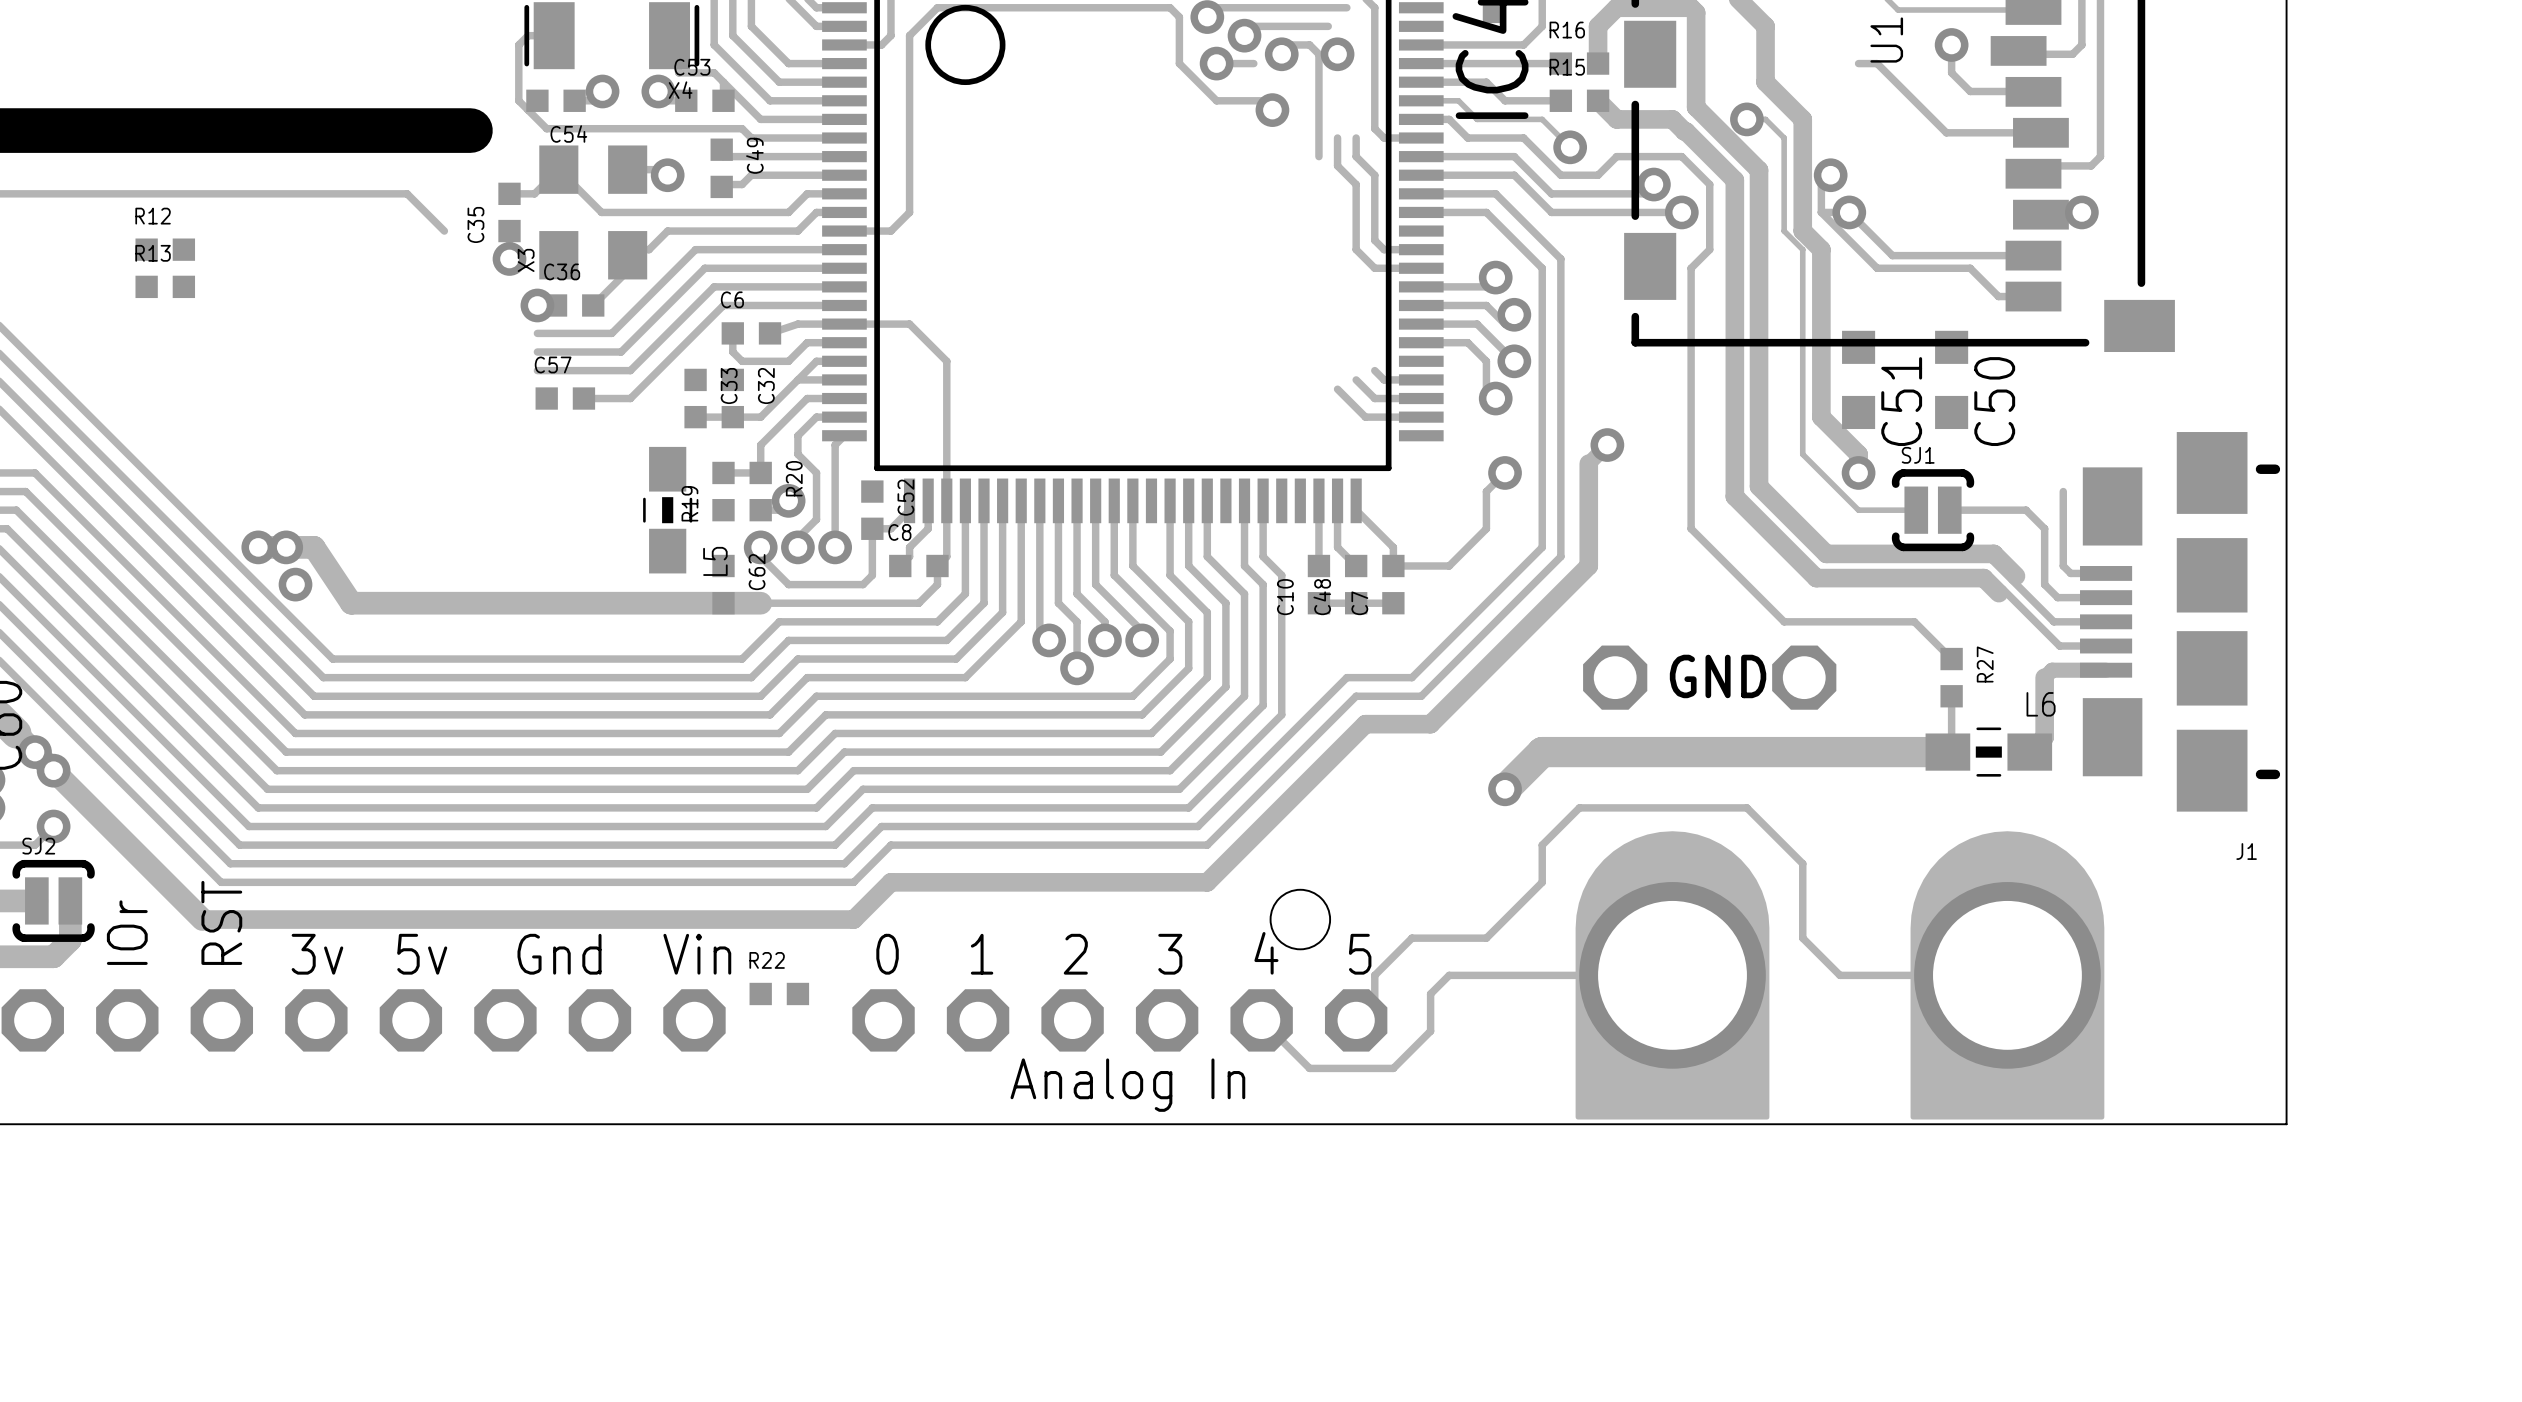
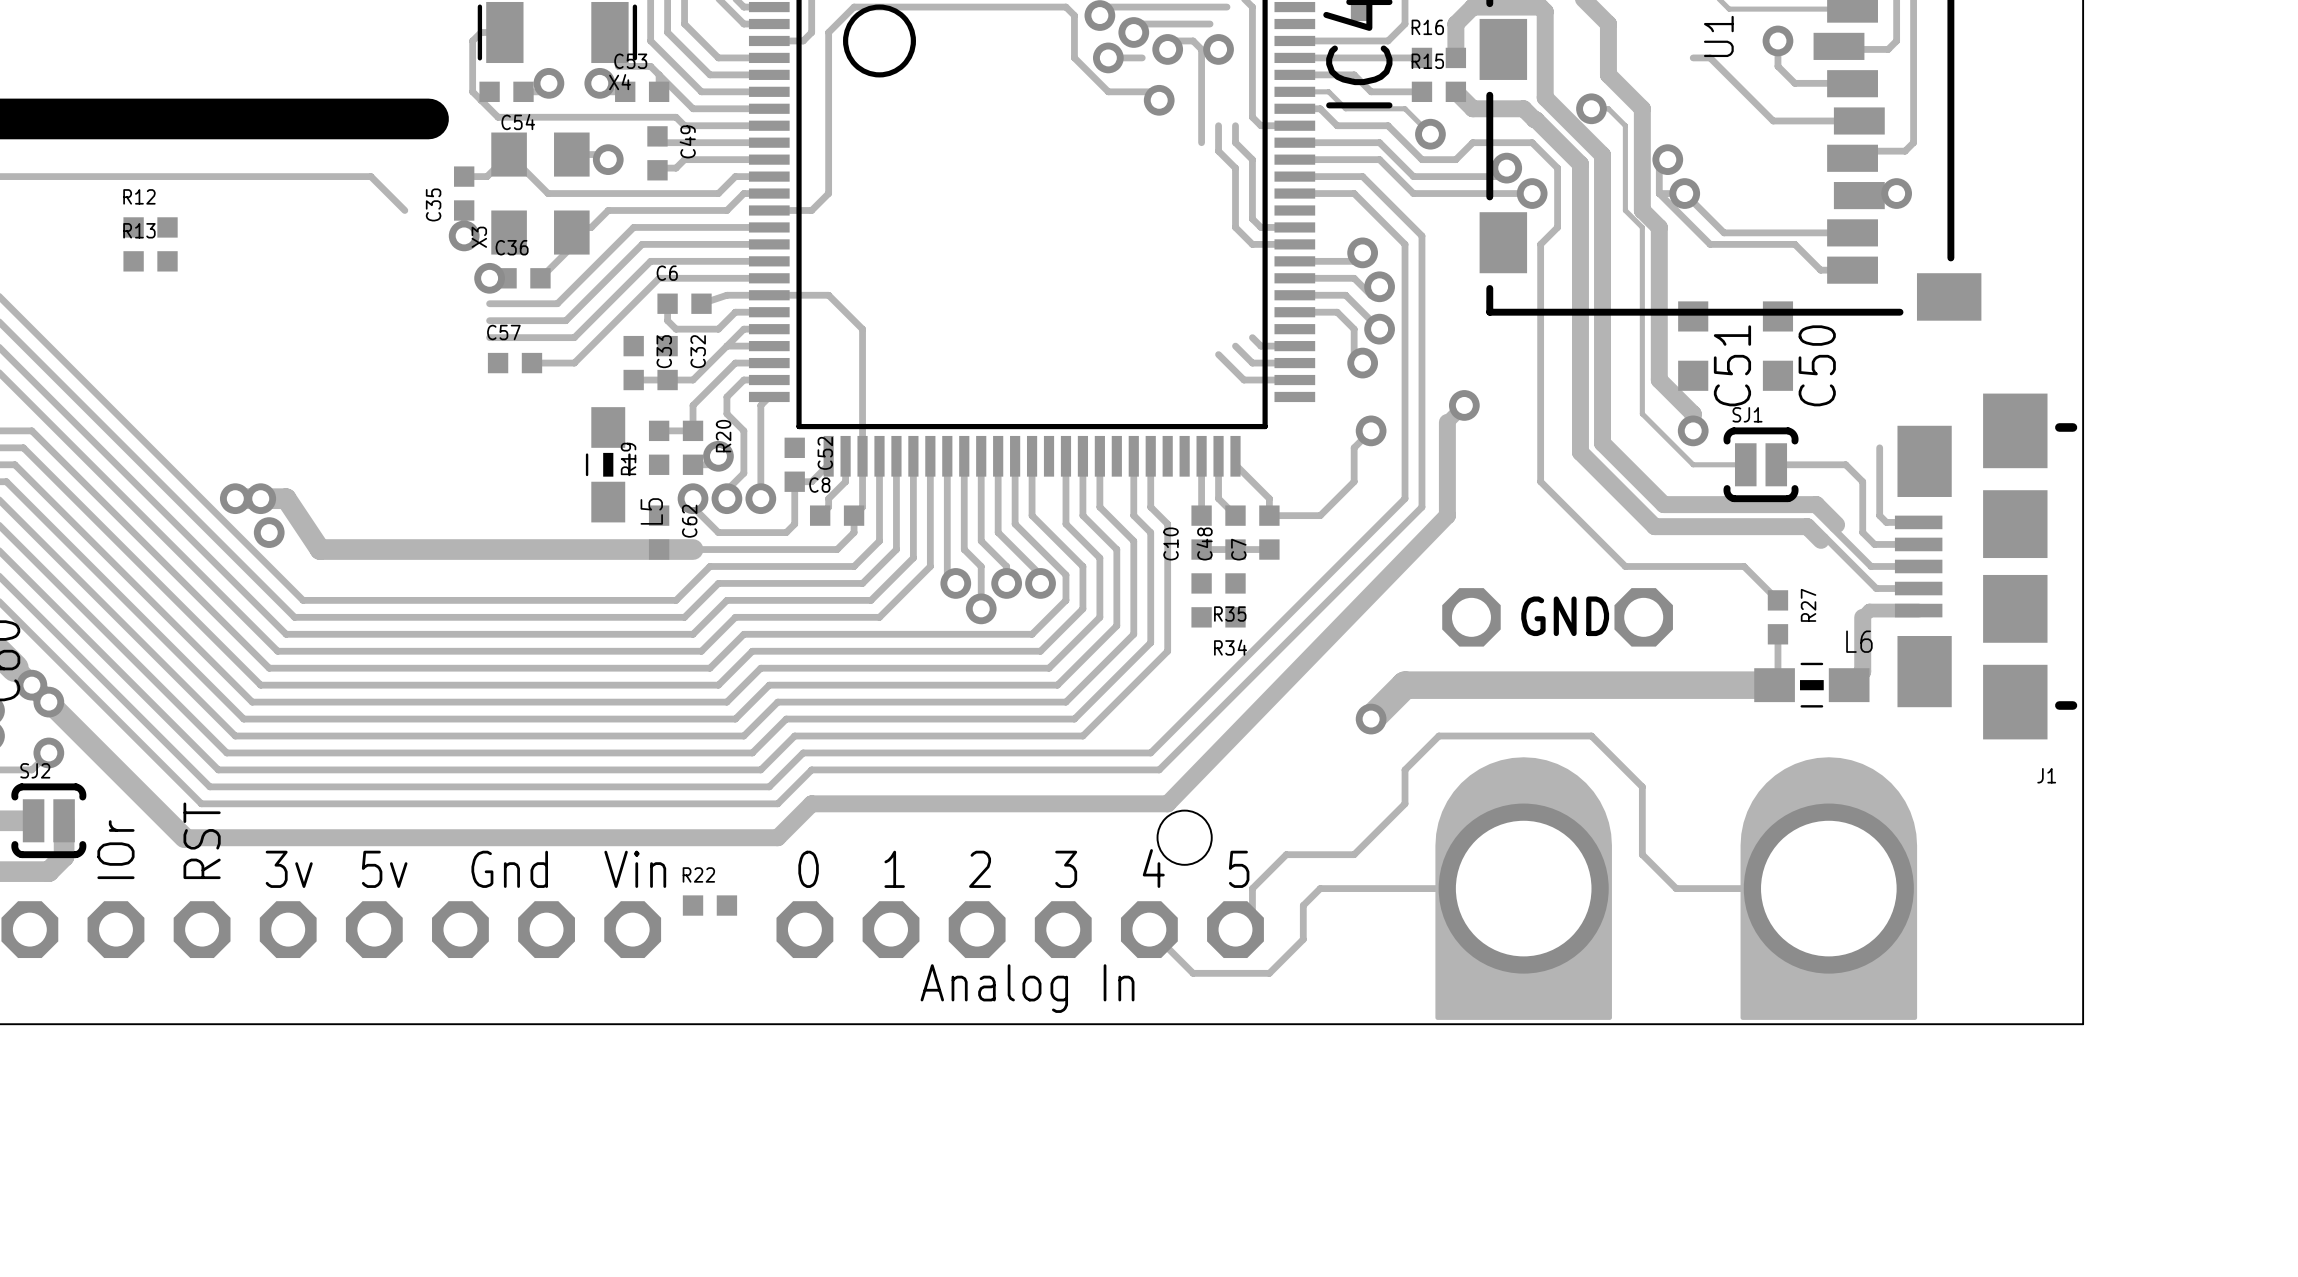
track: (1588, 566) (1430, 724) (1365, 724) -> (1447, 515) (1167, 803) (1099, 803)
R35: none -> (1218, 583)
R34: none -> (1218, 617)
track: (1411, 677) (1346, 677) (1198, 826) -> (1286, 617) (1243, 659)
track: (1421, 696) (1356, 696) (1207, 845) -> (1294, 634) (1159, 769) (1099, 769)
track width: thick (1365, 724) (1263, 826) -> thin (1243, 659) (1150, 752)
track: (1263, 826) (1207, 882) -> (1150, 752) (1091, 752)

